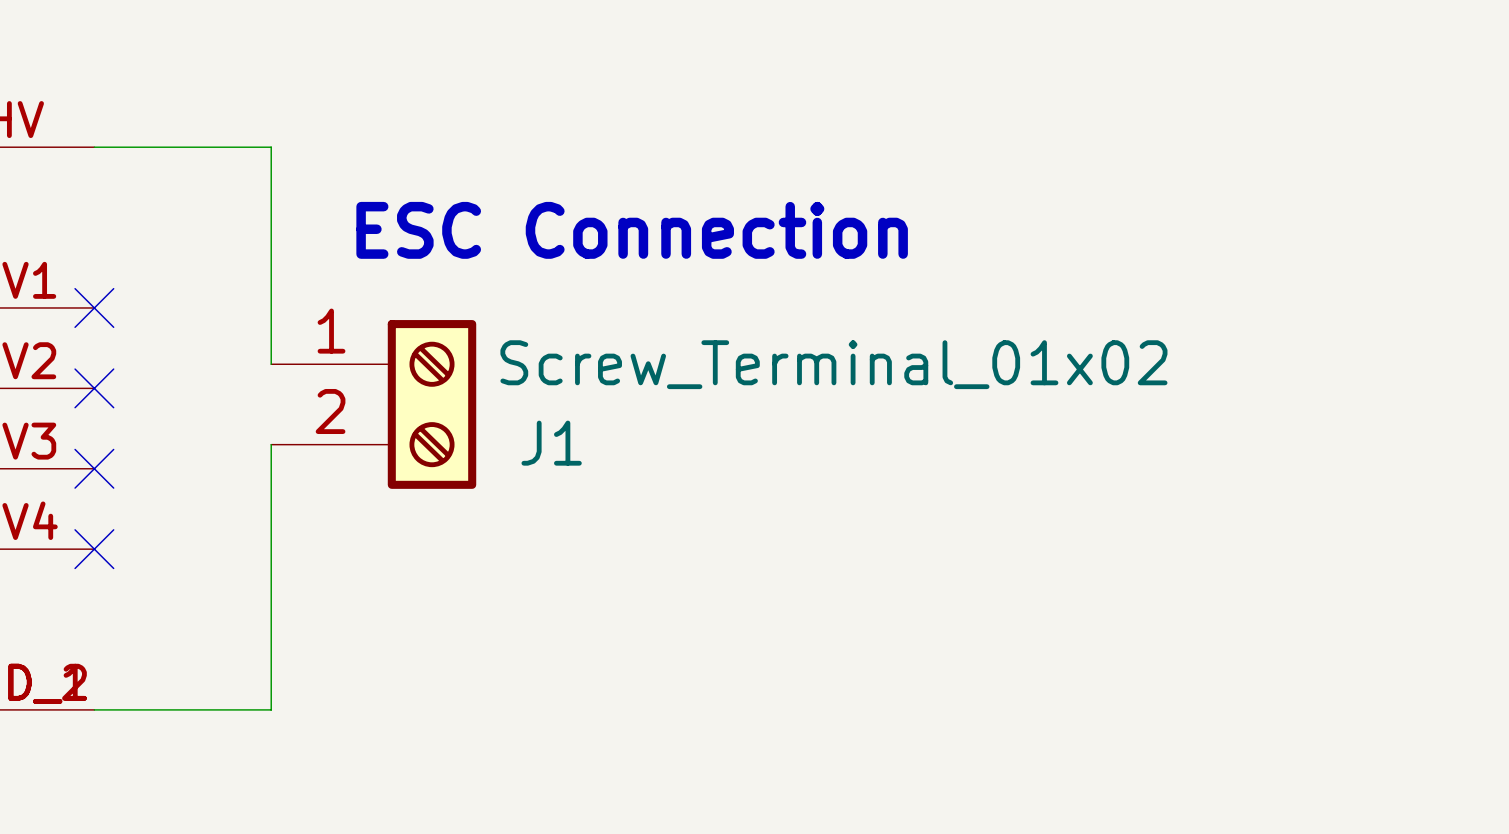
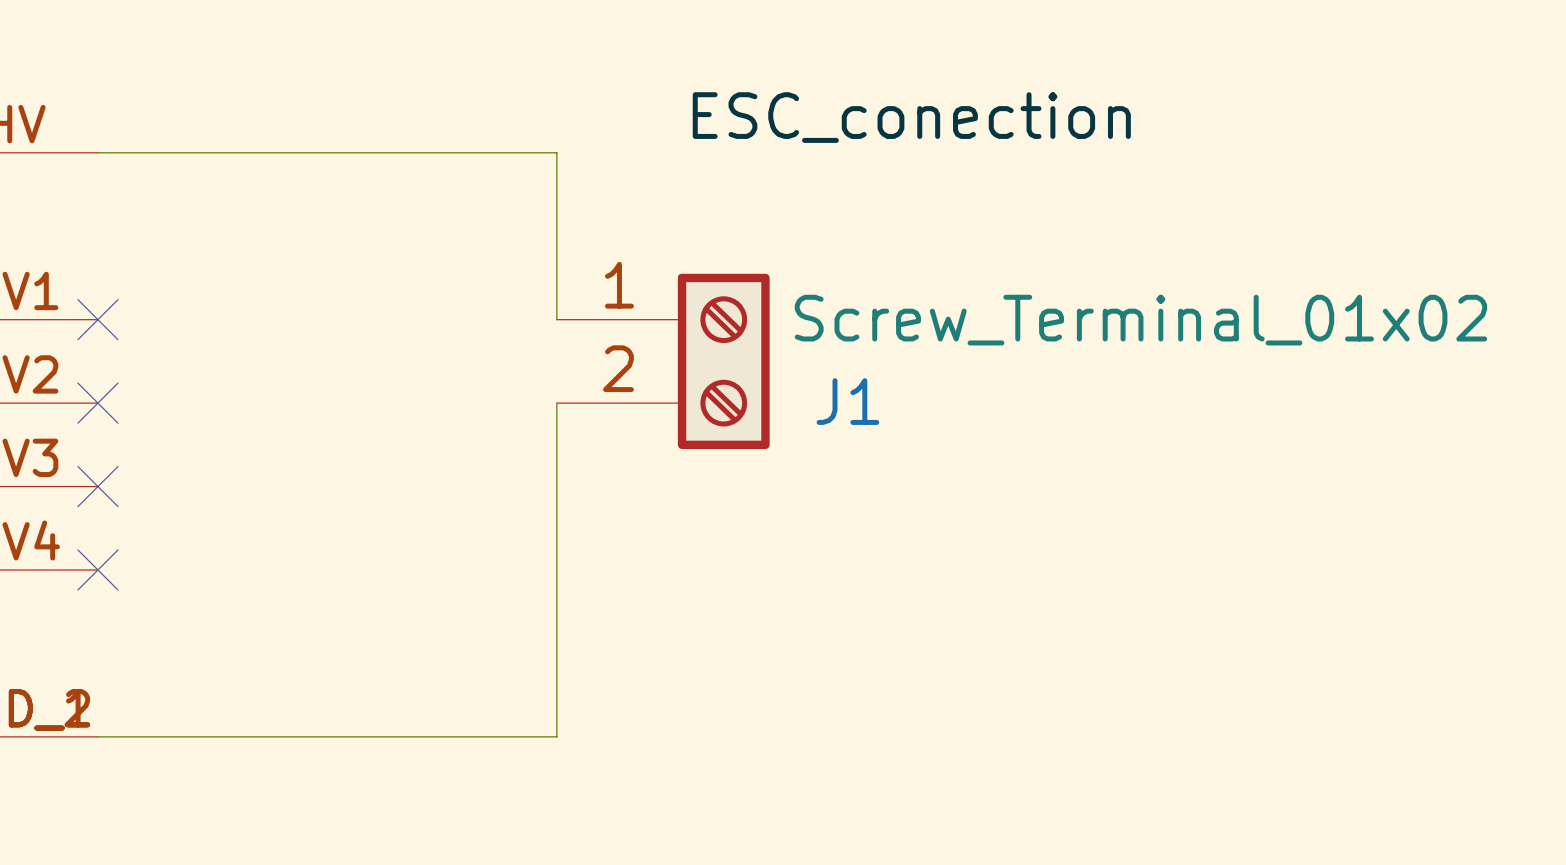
label: none -> ESC_conection (911, 117)
wire: (271, 147) (271, 364) -> (281, 152) (556, 152) (556, 319)
text: ESC Connection (632, 230) -> none
J1 position: (373, 404) -> (663, 361)
wire: (271, 444) (271, 709) -> (556, 403) (556, 736) (281, 736)

